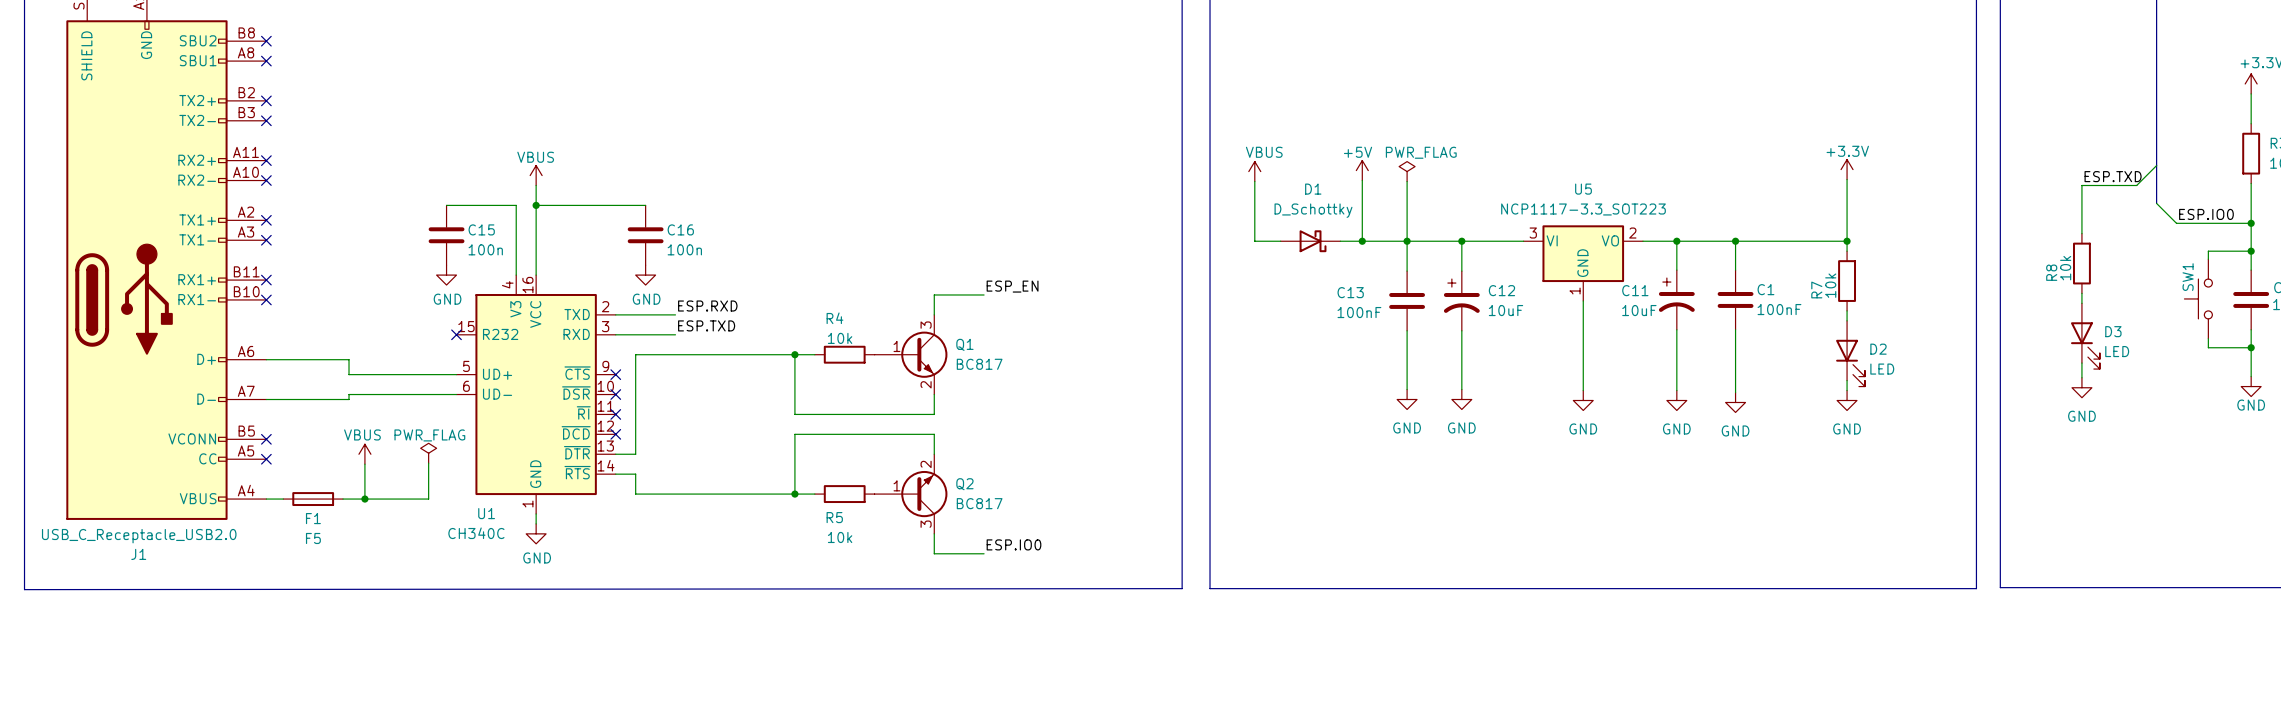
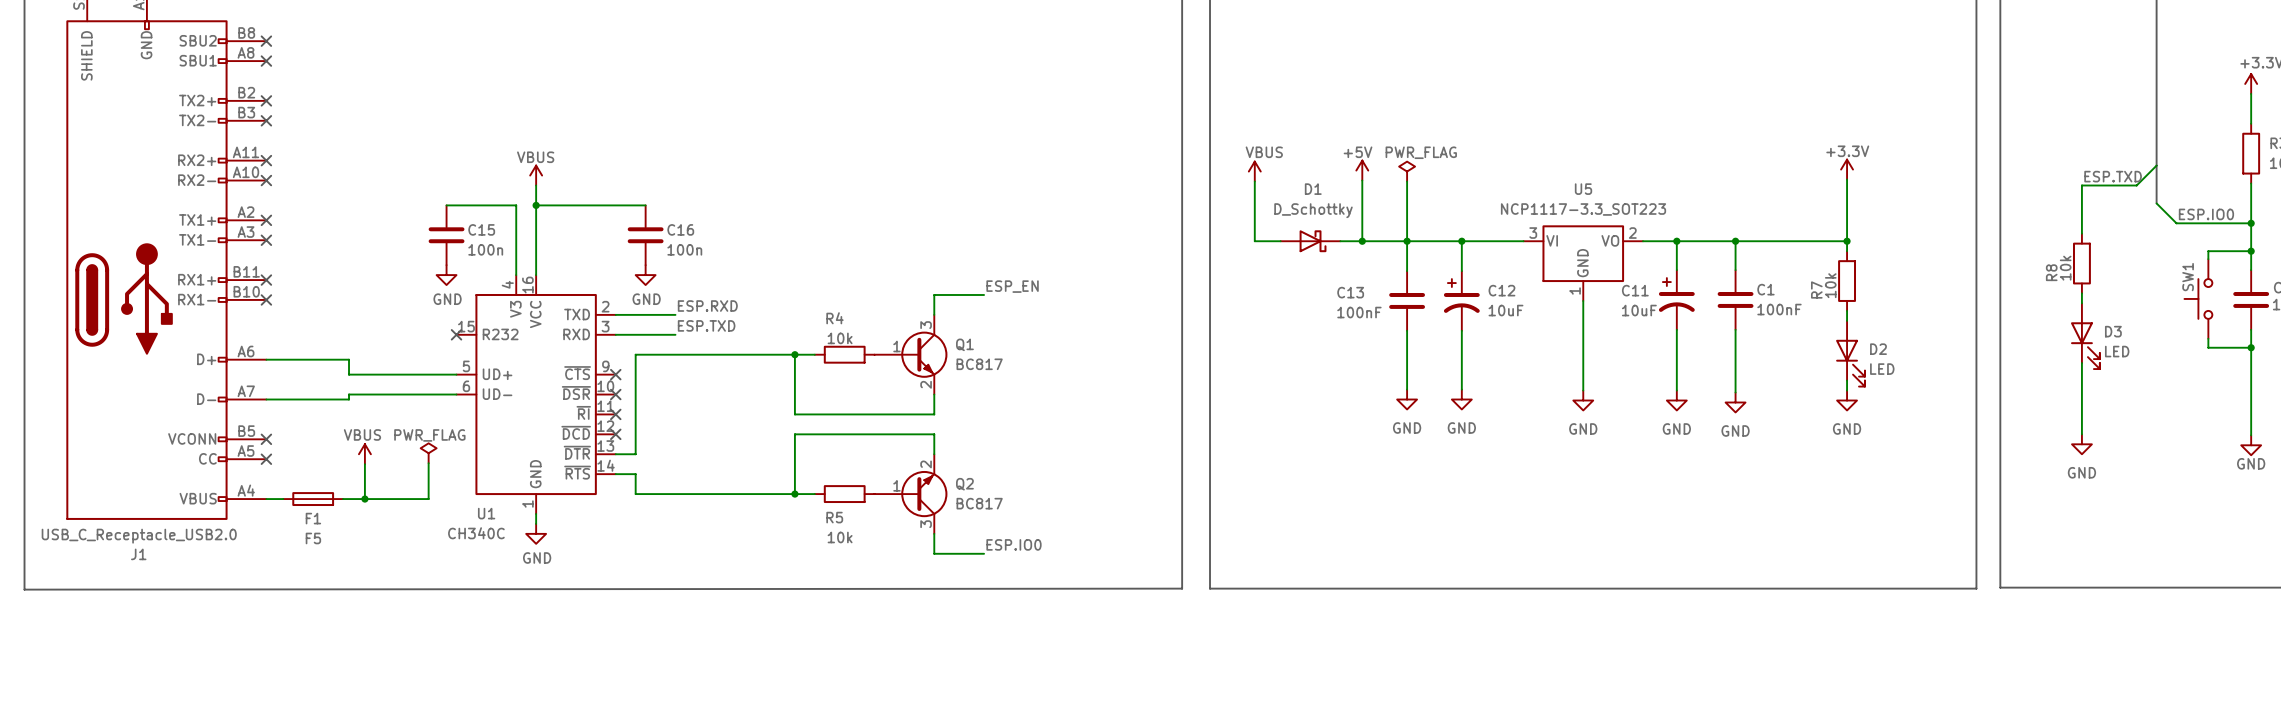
wire: none -> (2251, 376) (2251, 435)
wire: none -> (2081, 377) (2081, 434)
power symbol position: GND (2251, 386) -> GND (2251, 445)
power symbol position: GND (2081, 387) -> GND (2081, 444)

